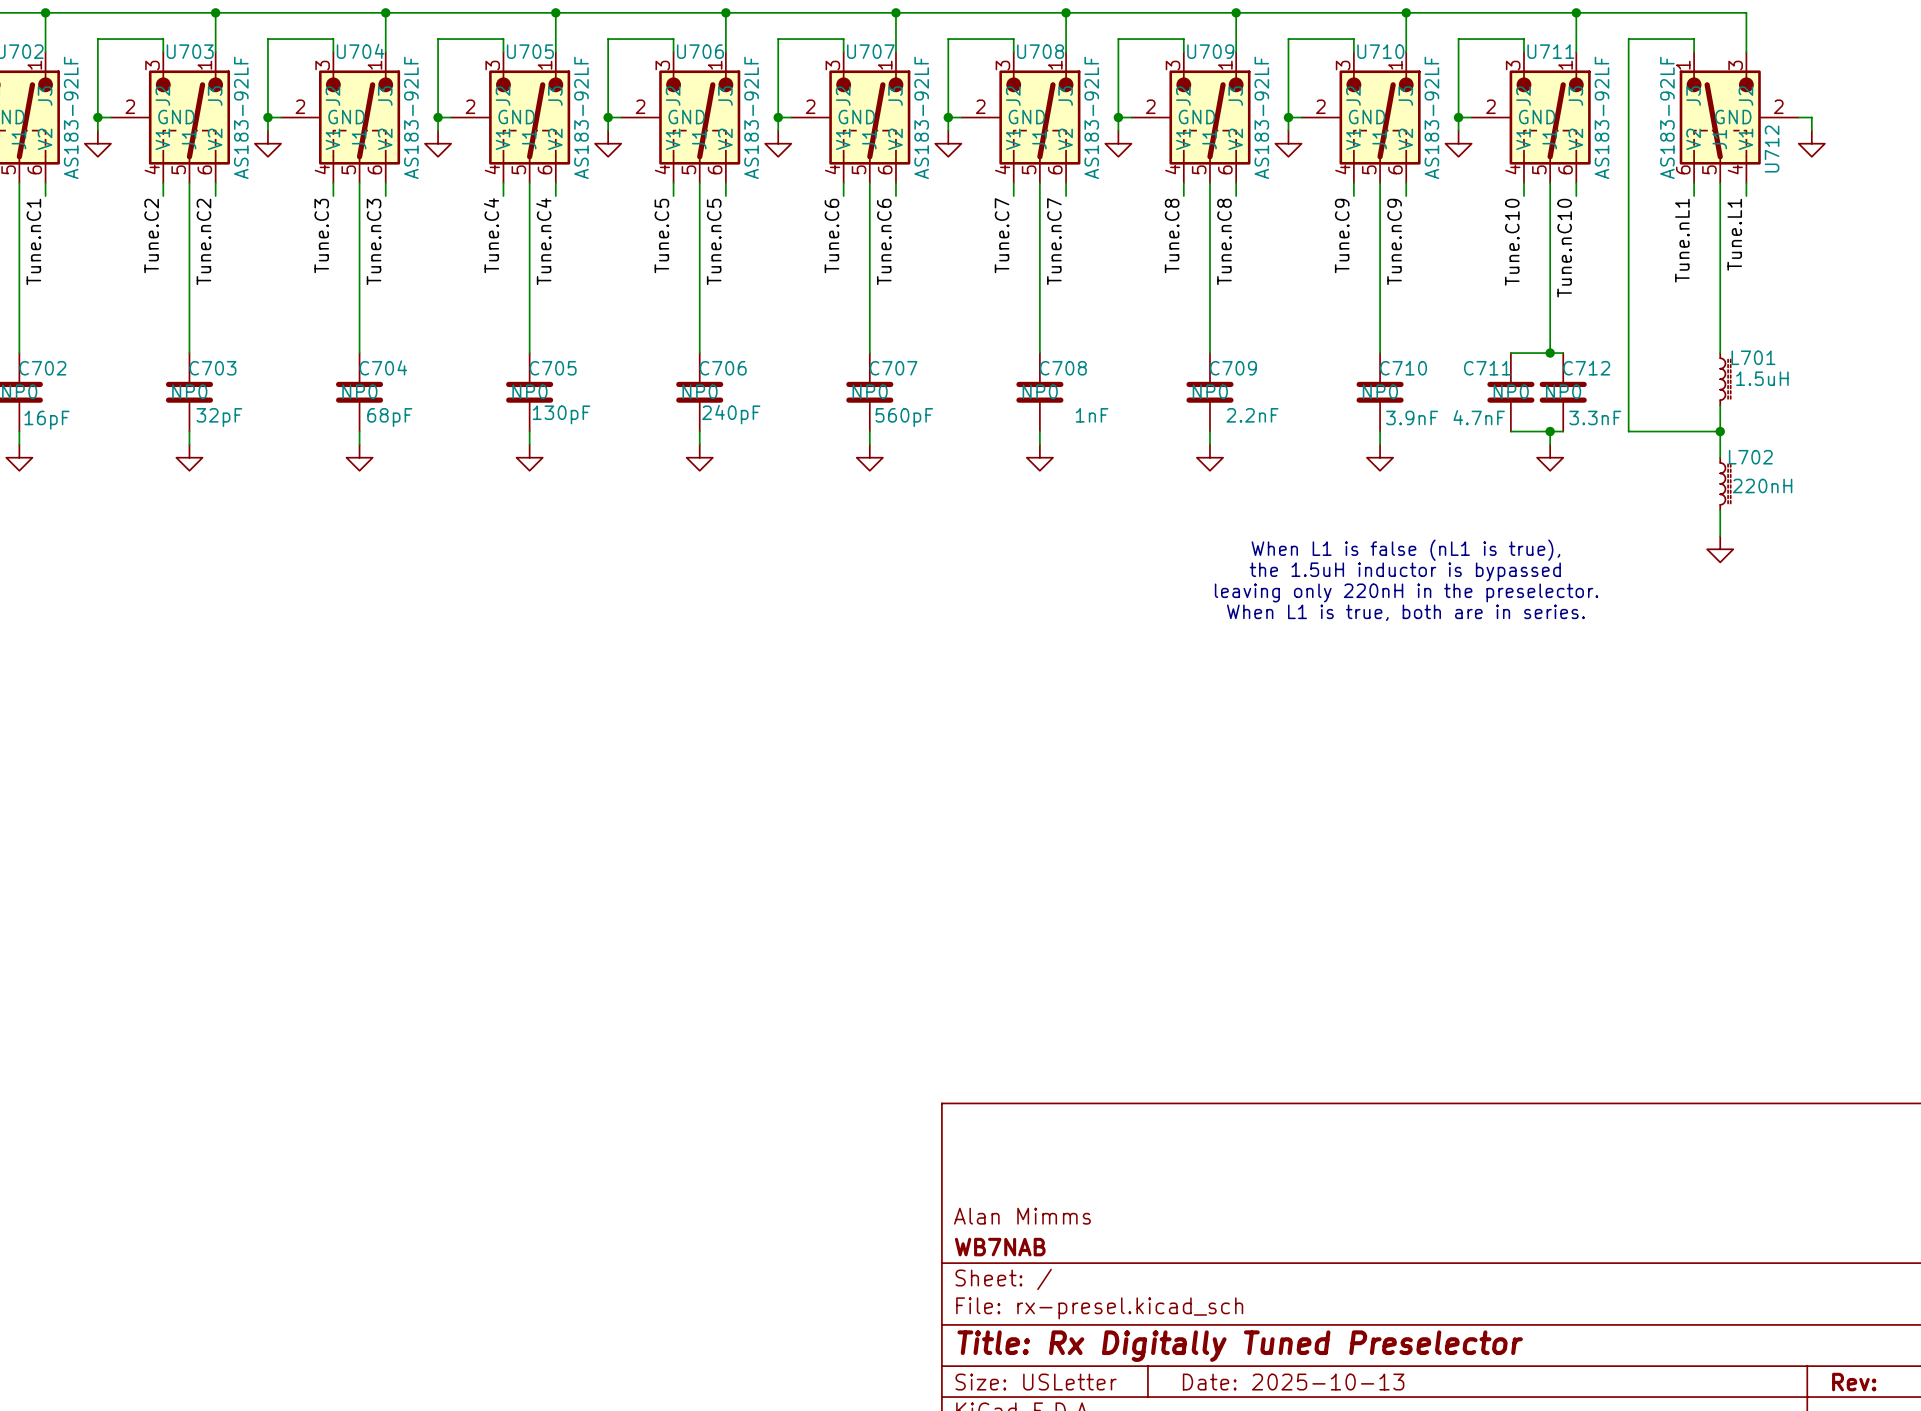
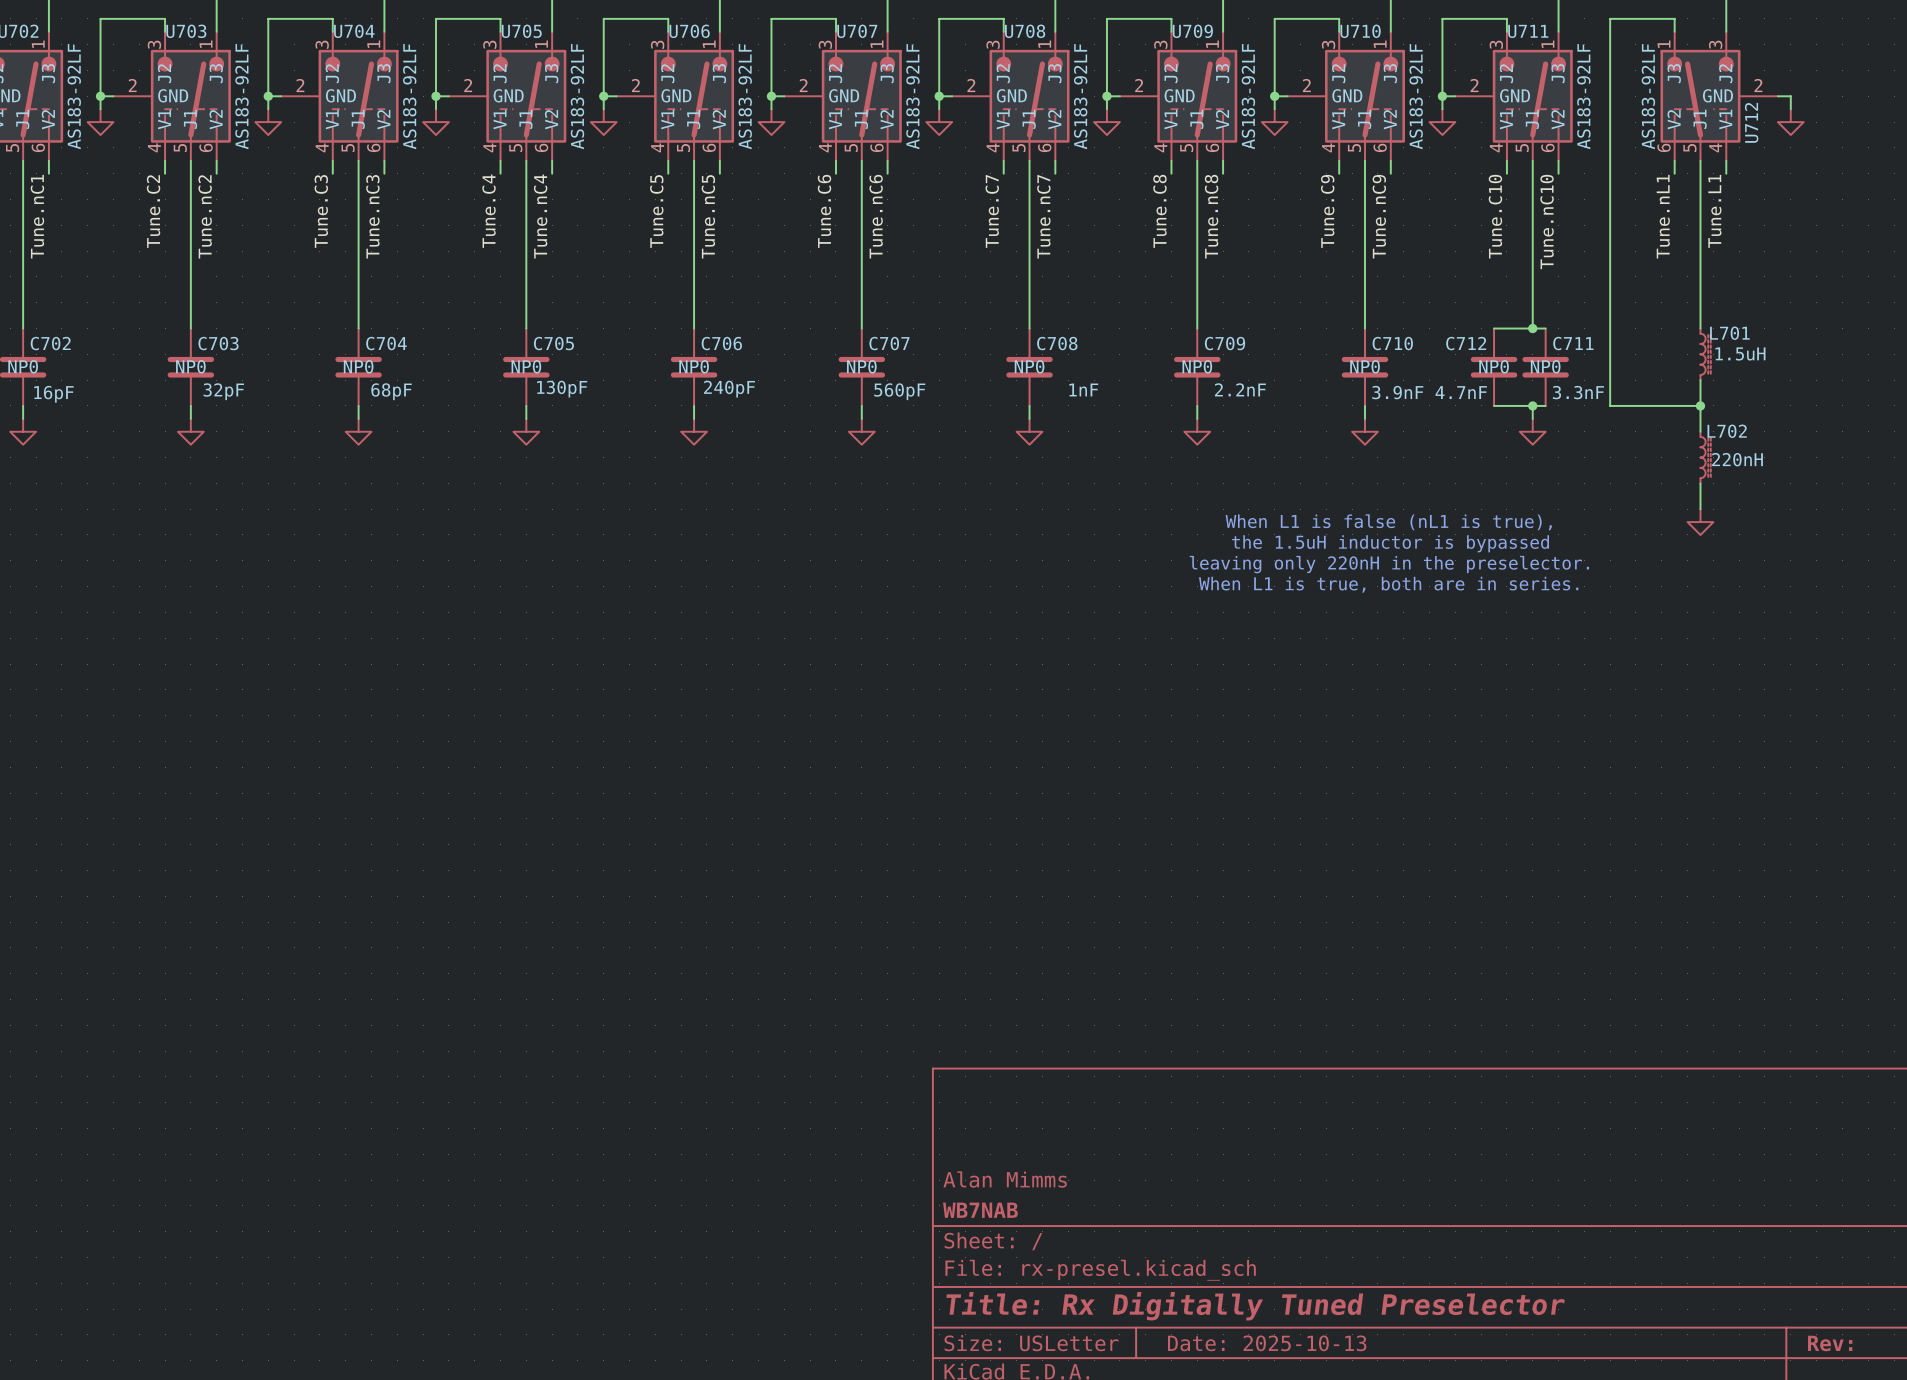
C711 name: C711 (1487, 368) -> C712 (1466, 343)
C712 name: C712 (1586, 368) -> C711 (1573, 343)

